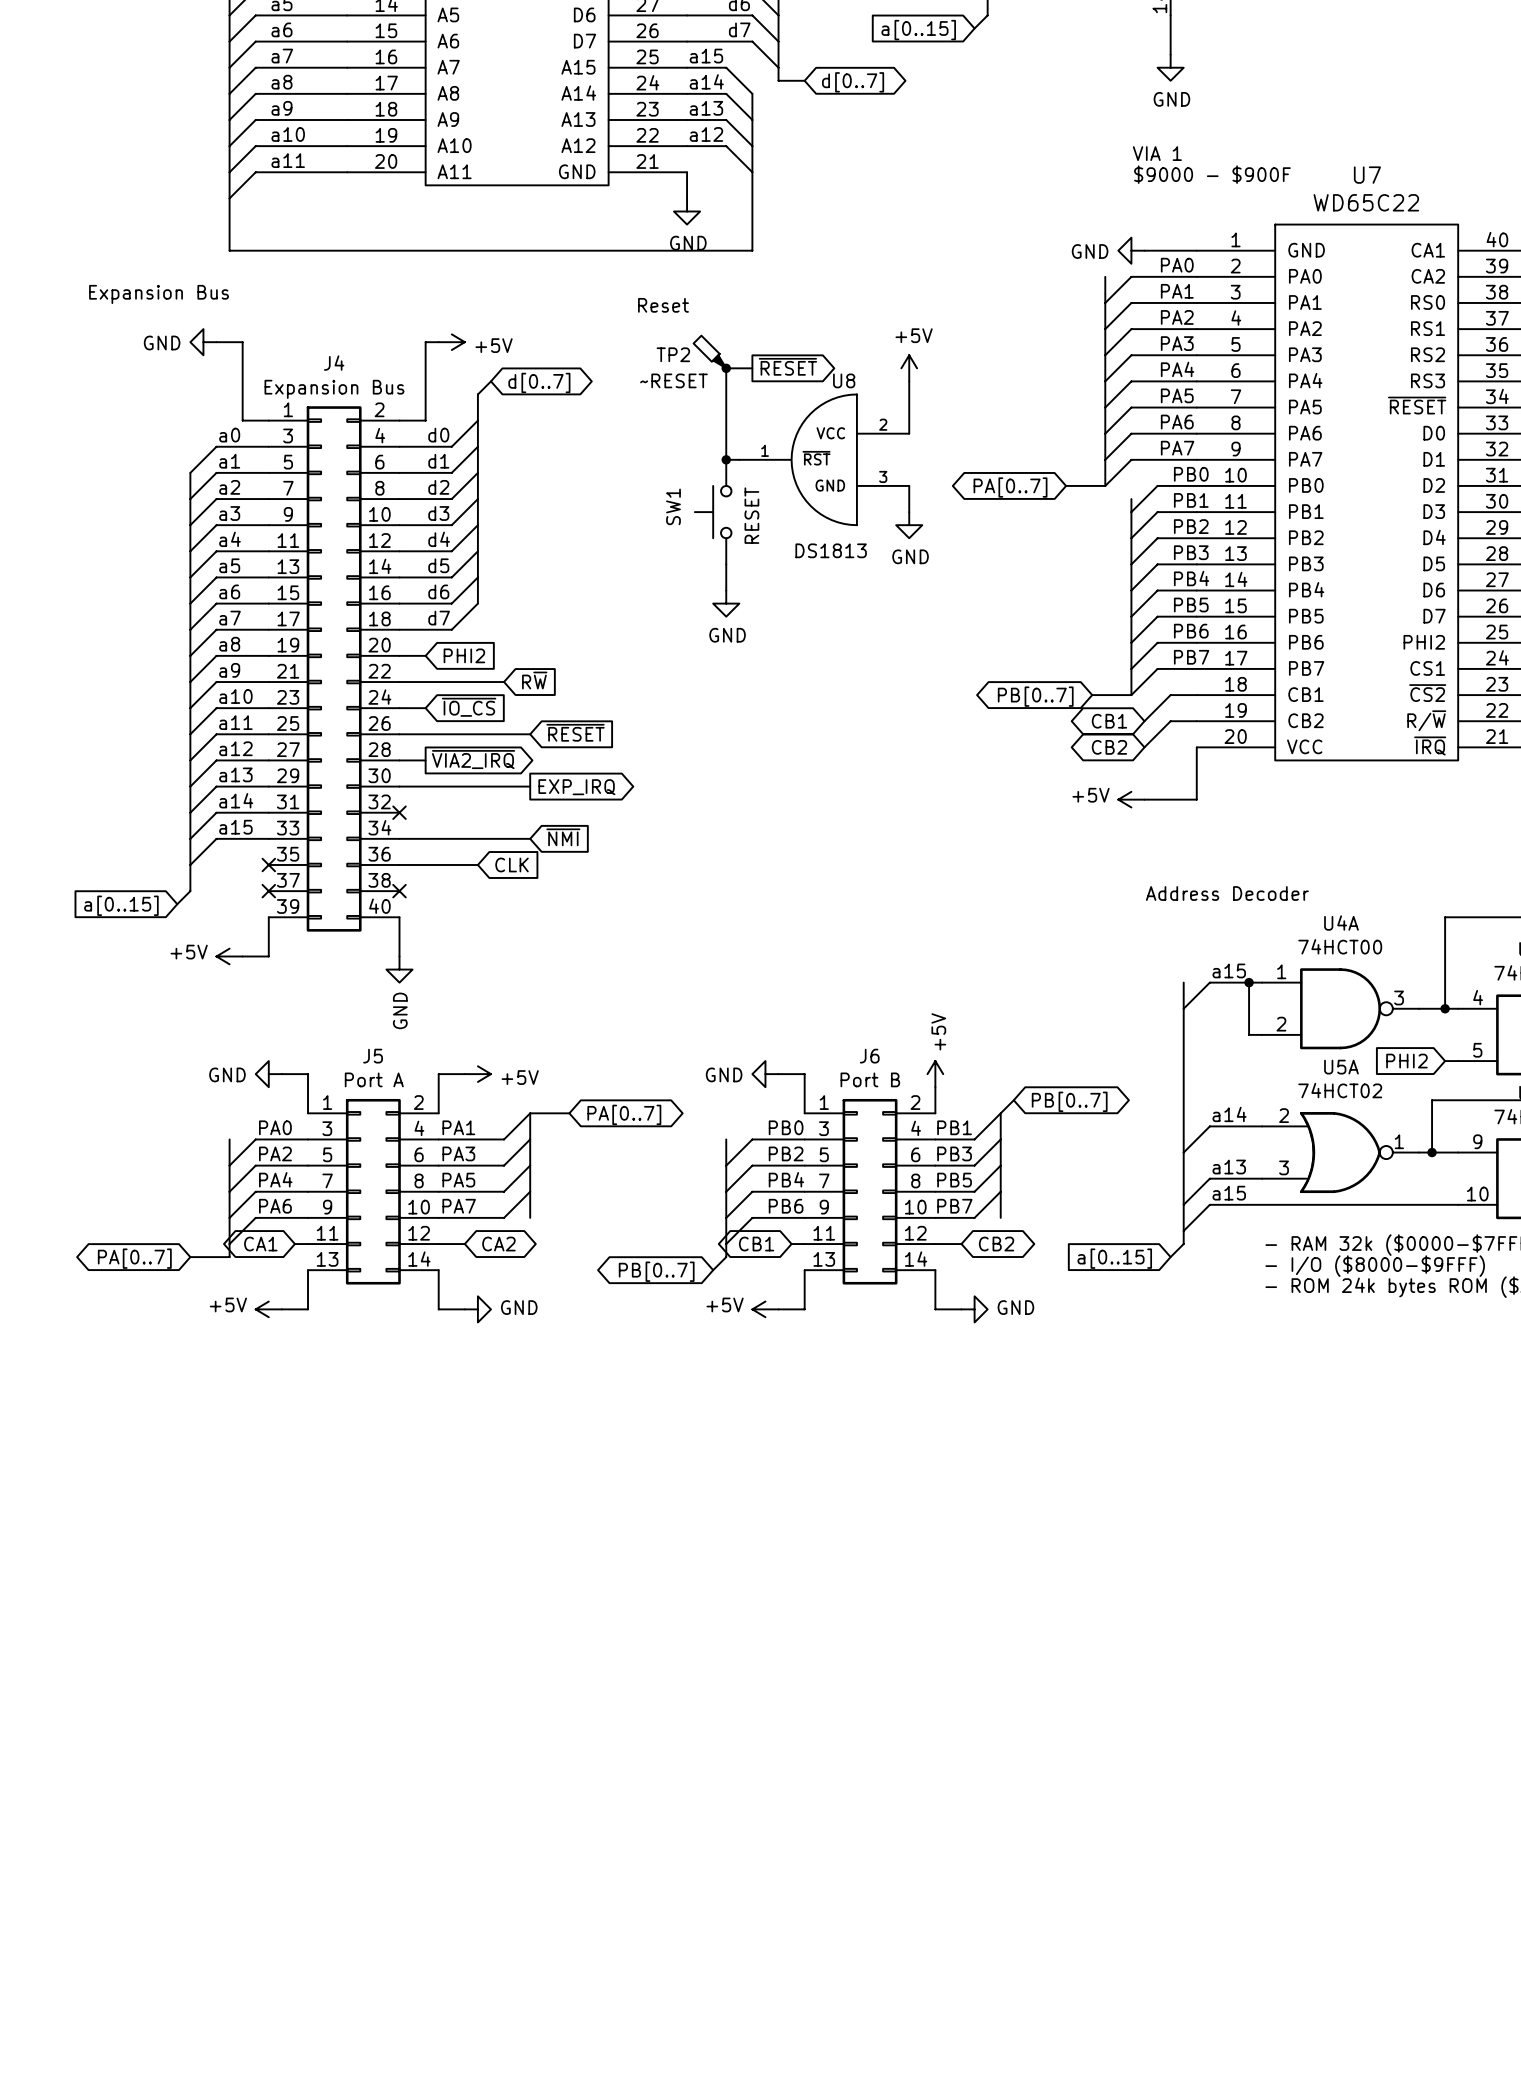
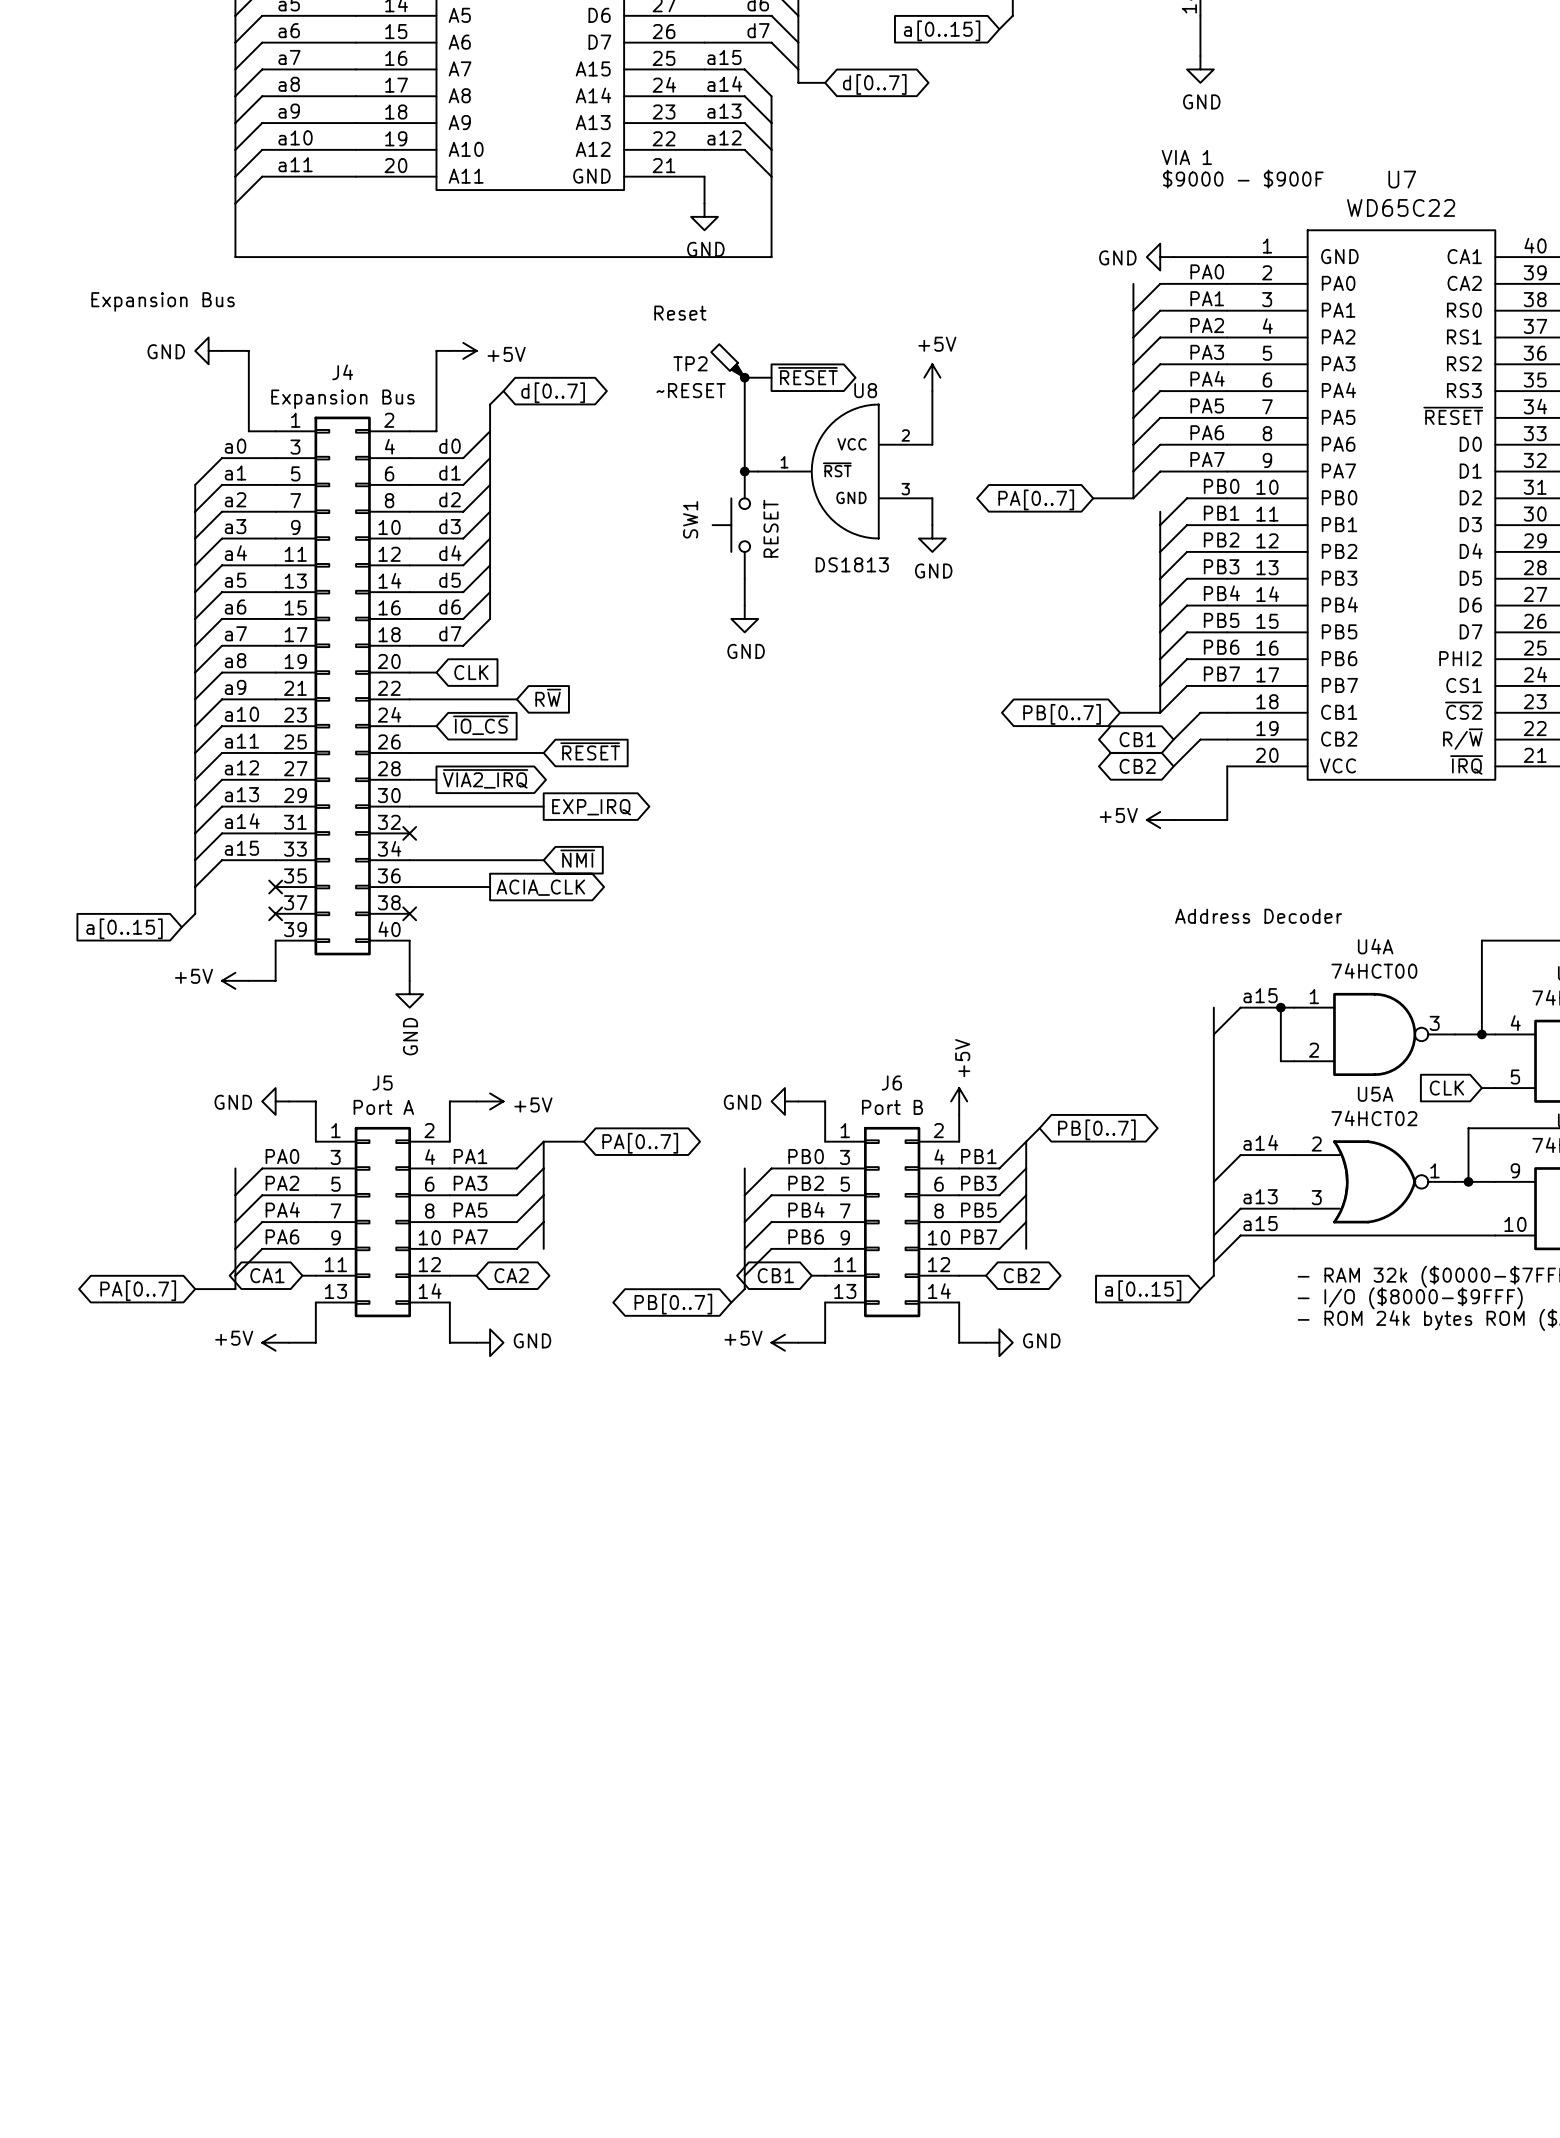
global label: PHI2 (464, 655) -> CLK (471, 672)
global label shape: input (512, 864) -> output (540, 887)
global label: CLK (512, 864) -> ACIA_CLK (540, 887)
global label: PHI2 (1406, 1061) -> CLK (1446, 1088)

